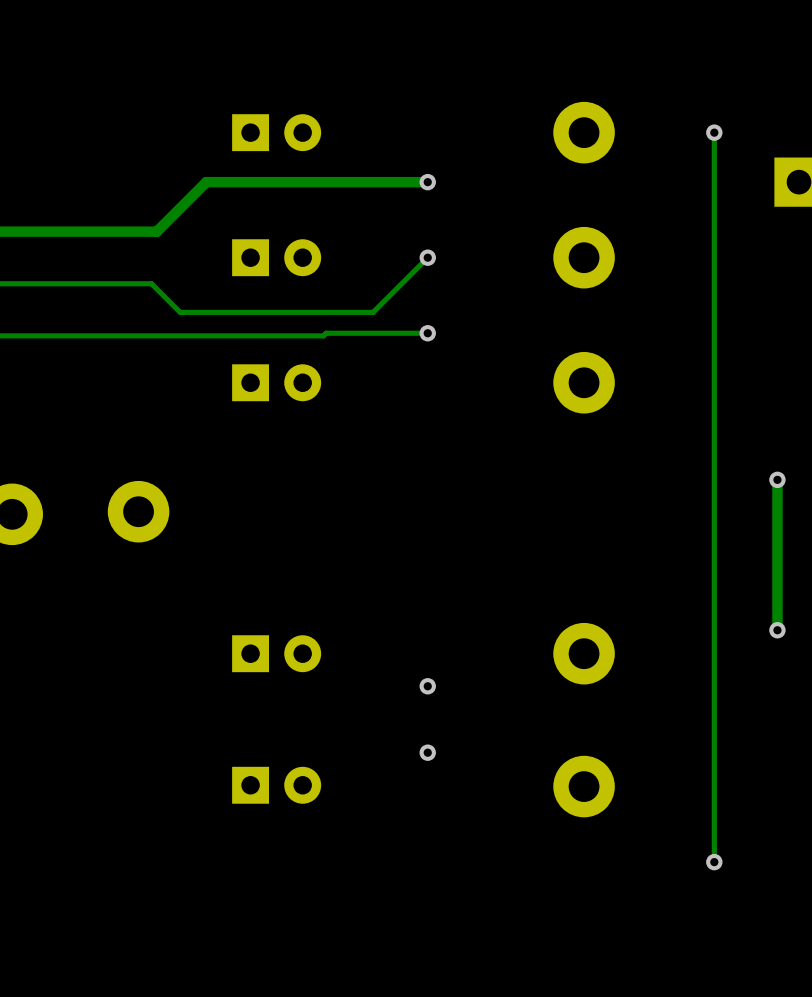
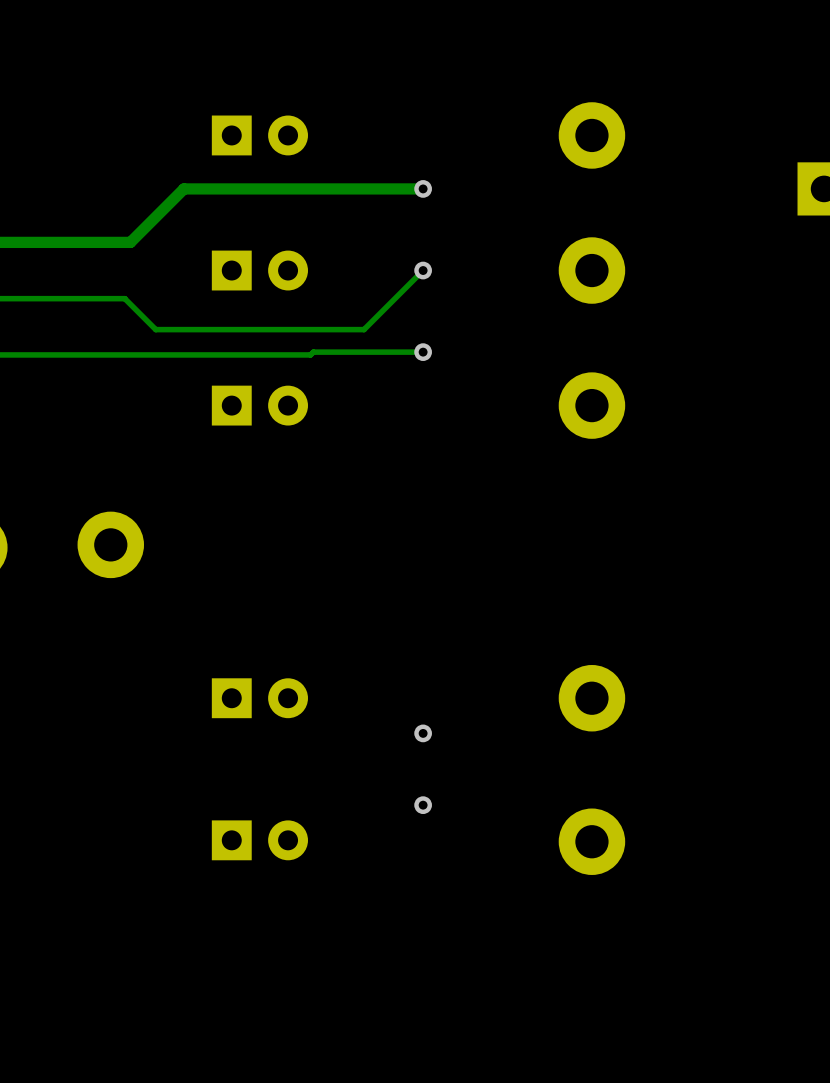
track: (714, 132) (714, 862) -> none
via: (714, 132) -> none
track: (777, 479) (777, 630) -> none
via: (777, 479) -> none
via: (777, 630) -> none
via: (714, 862) -> none

